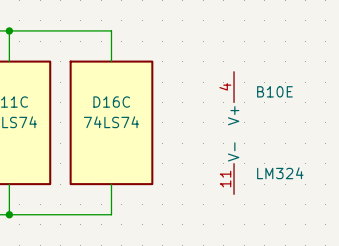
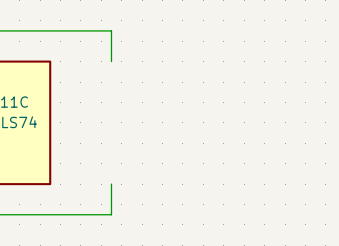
wire: (9, 30) (9, 61) -> none
junction: (9, 30) -> none
D16C: 74LS74 (111, 122) -> none
B10E: LM324 (234, 133) -> none
wire: (9, 184) (9, 214) -> none
junction: (9, 214) -> none

